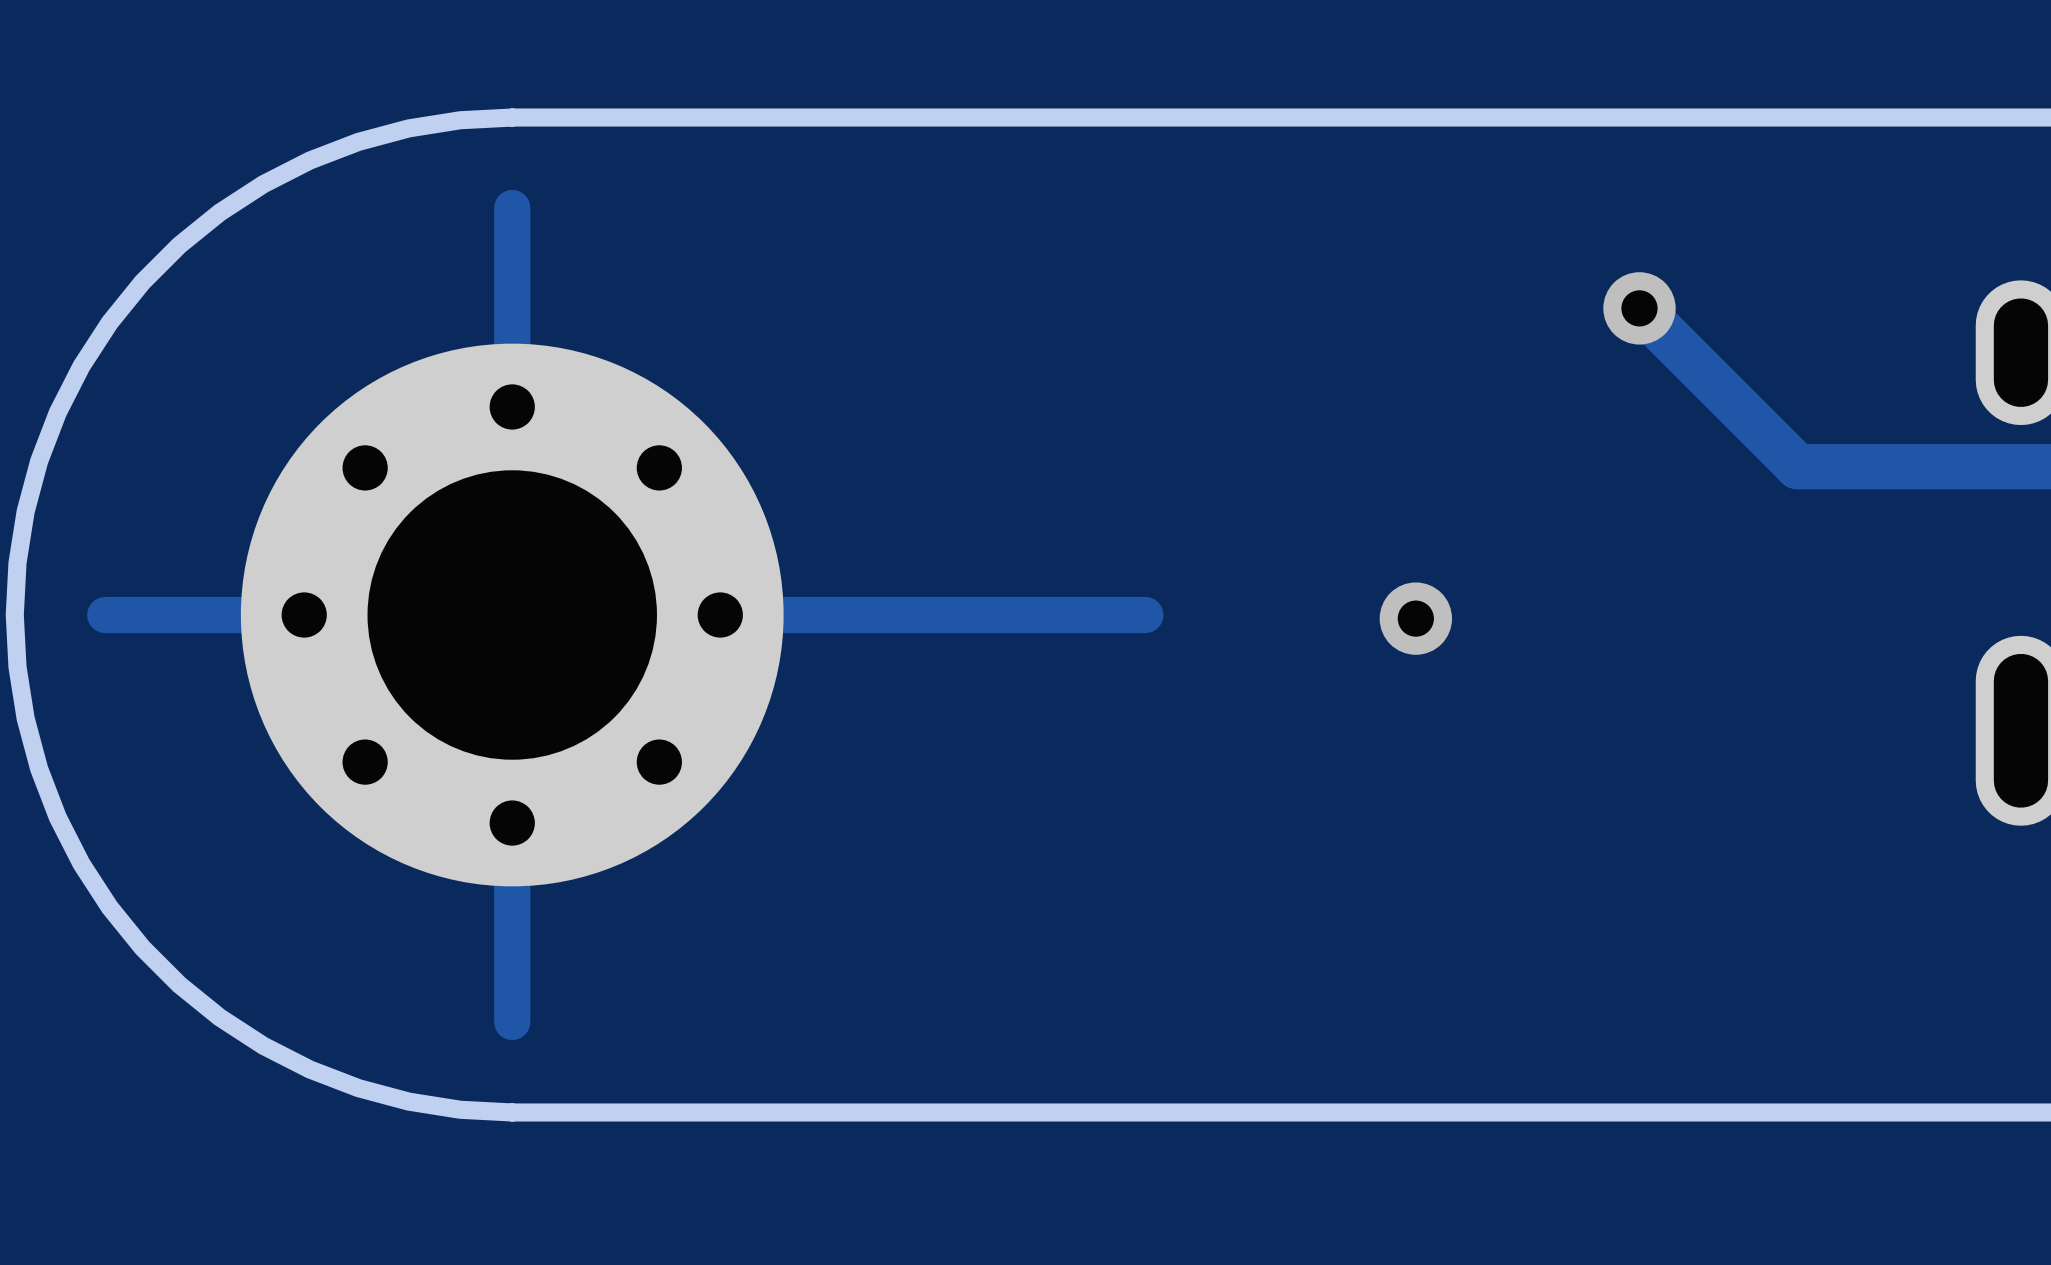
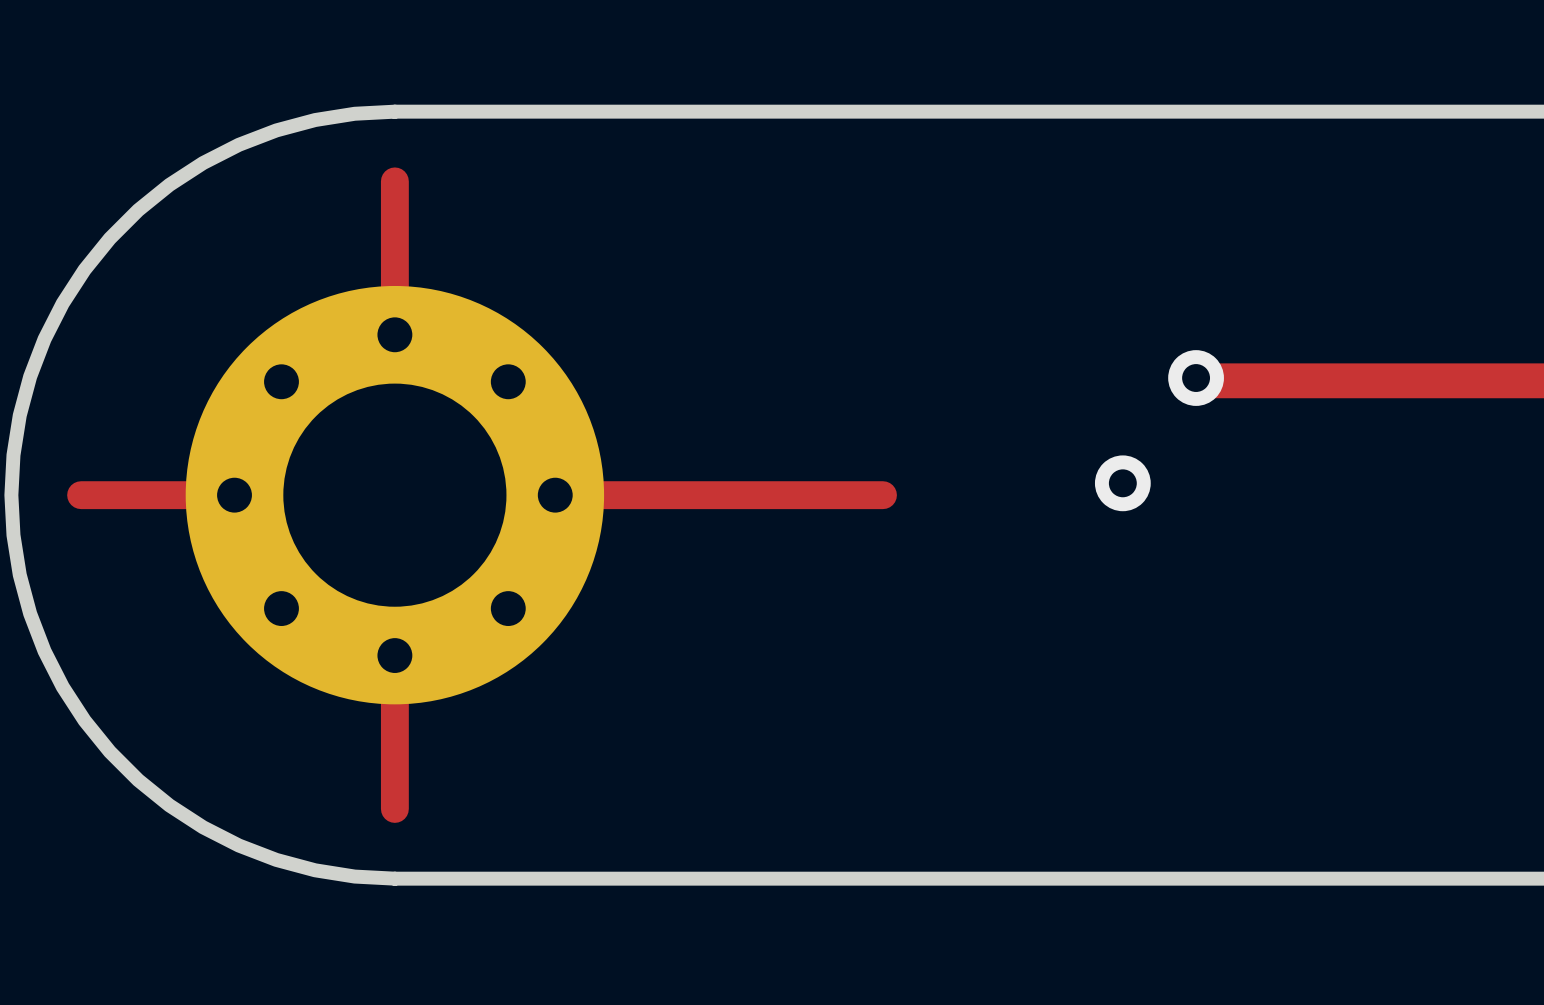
track: (1639, 308) (1797, 466) -> (1196, 378) (1198, 380) (1385, 380)
via: (1639, 308) -> none
via: none -> (1196, 378)
via position: (1415, 618) -> (1122, 483)

